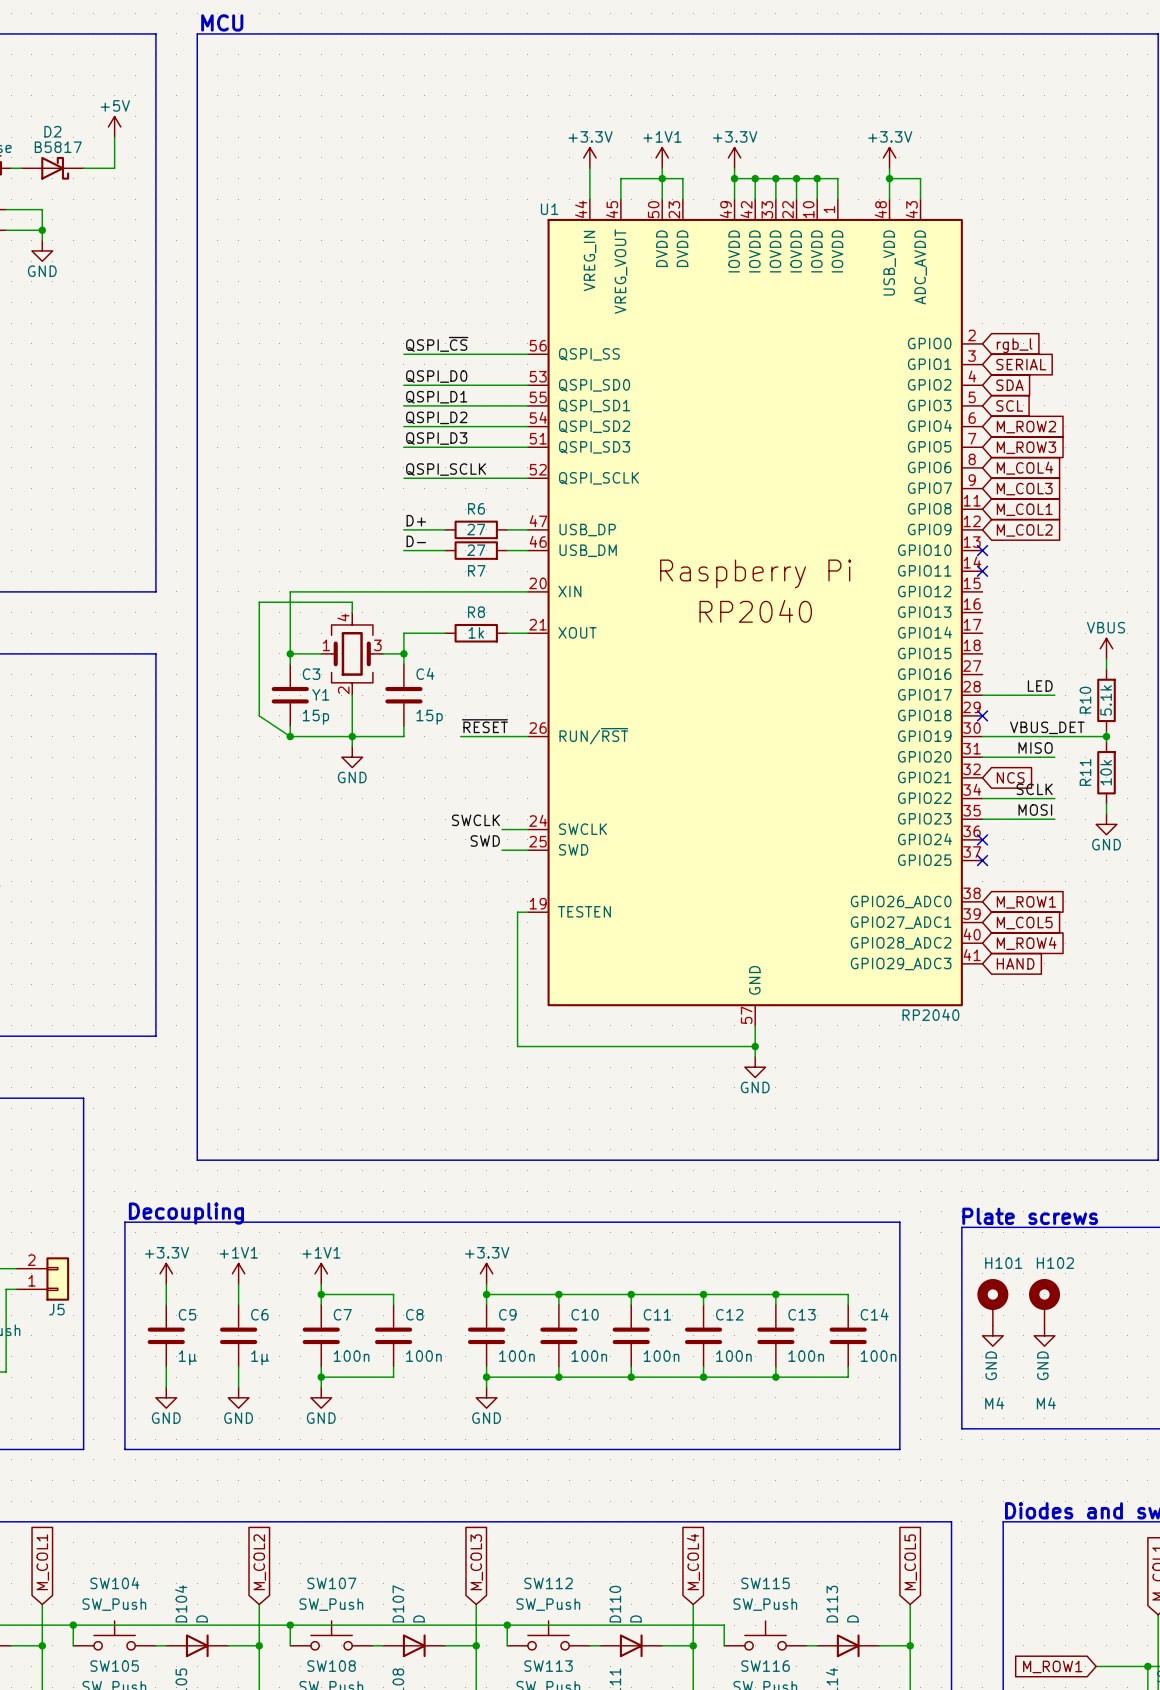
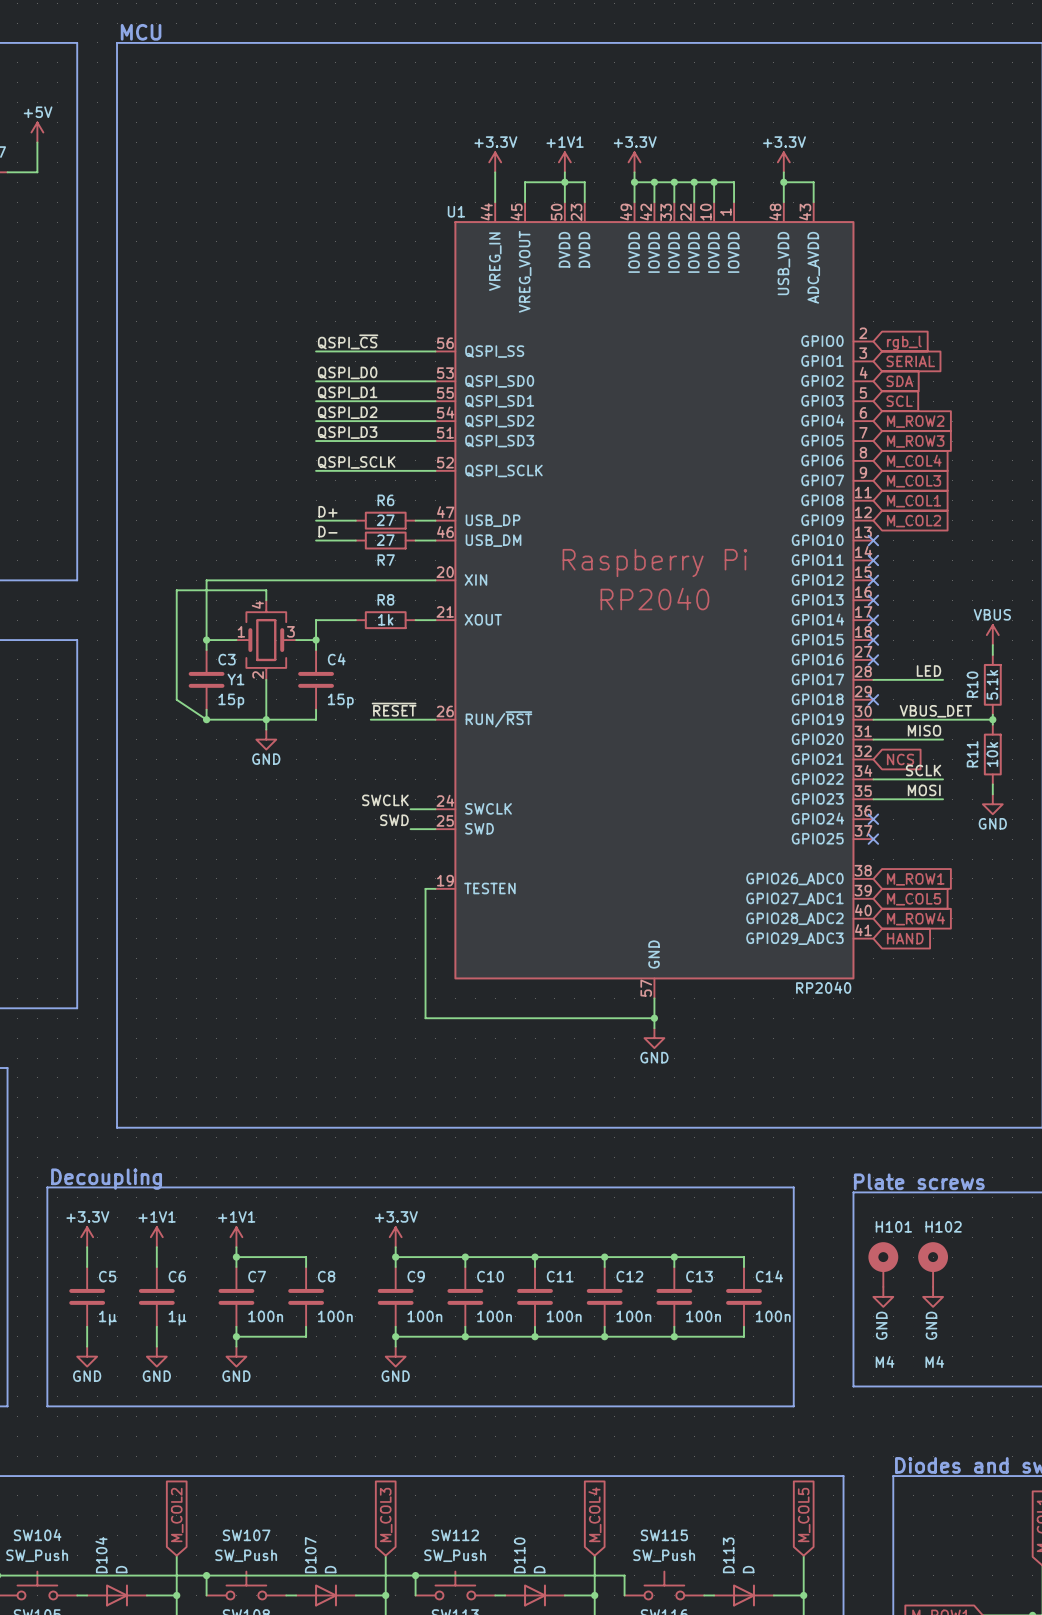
no-connect mark: none -> (873, 580)
no-connect mark: none -> (873, 600)
no-connect mark: none -> (873, 620)
no-connect mark: none -> (873, 640)
no-connect mark: none -> (873, 659)

